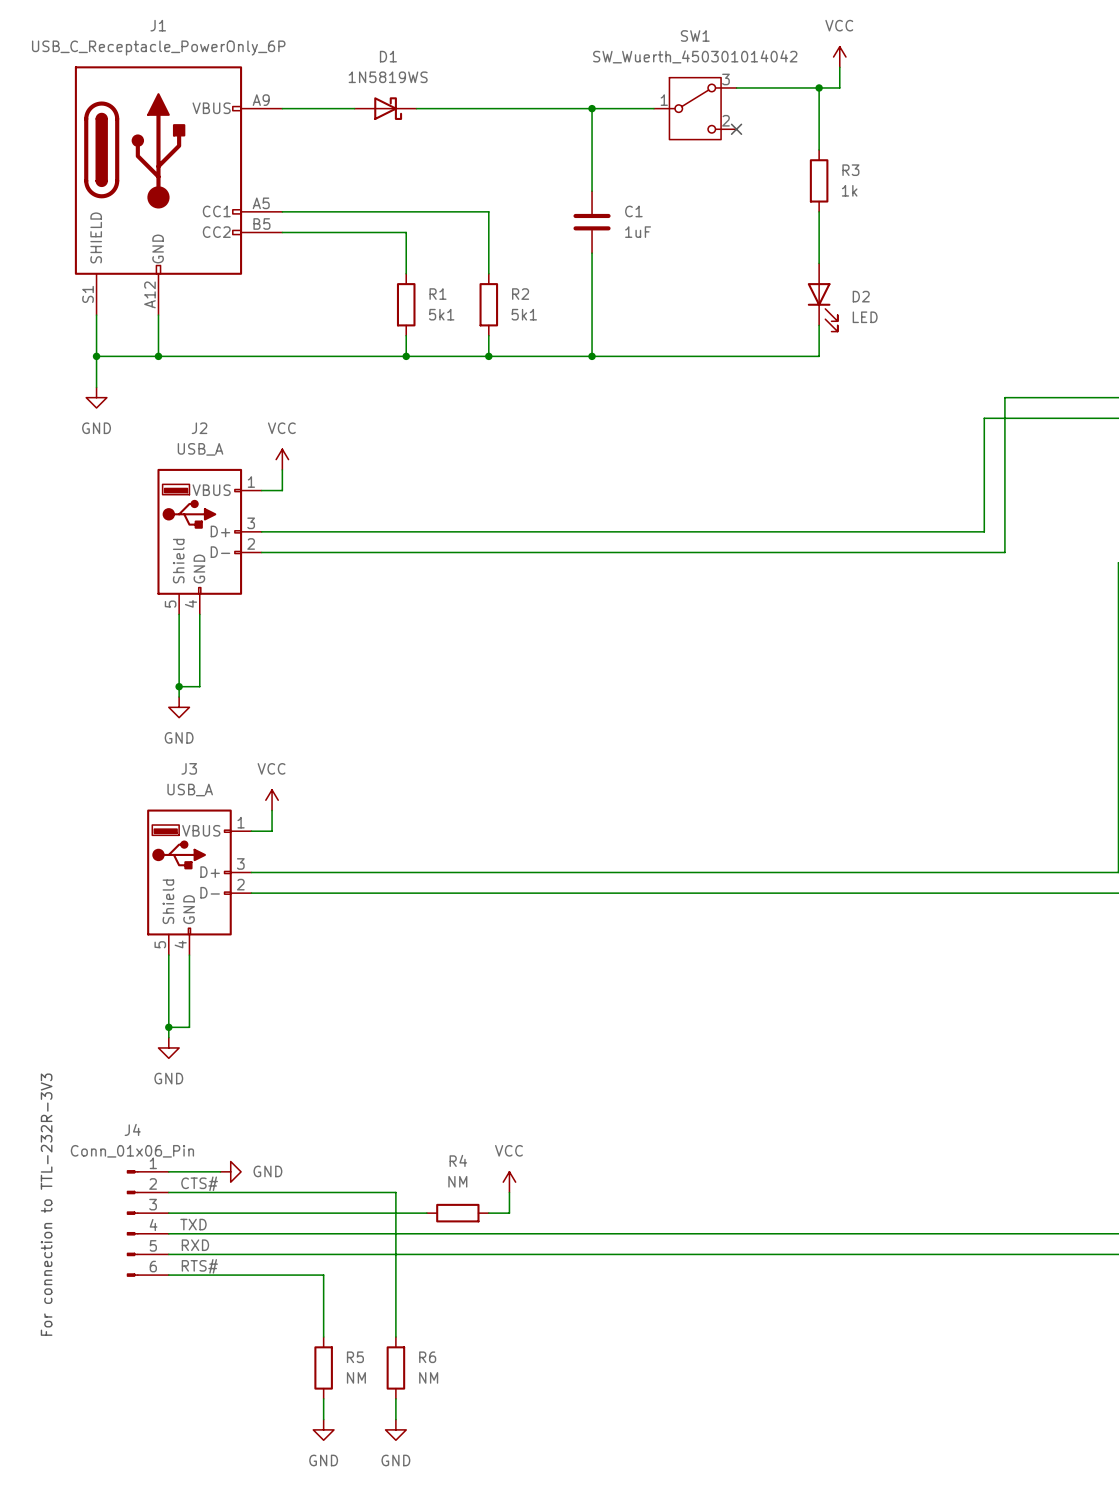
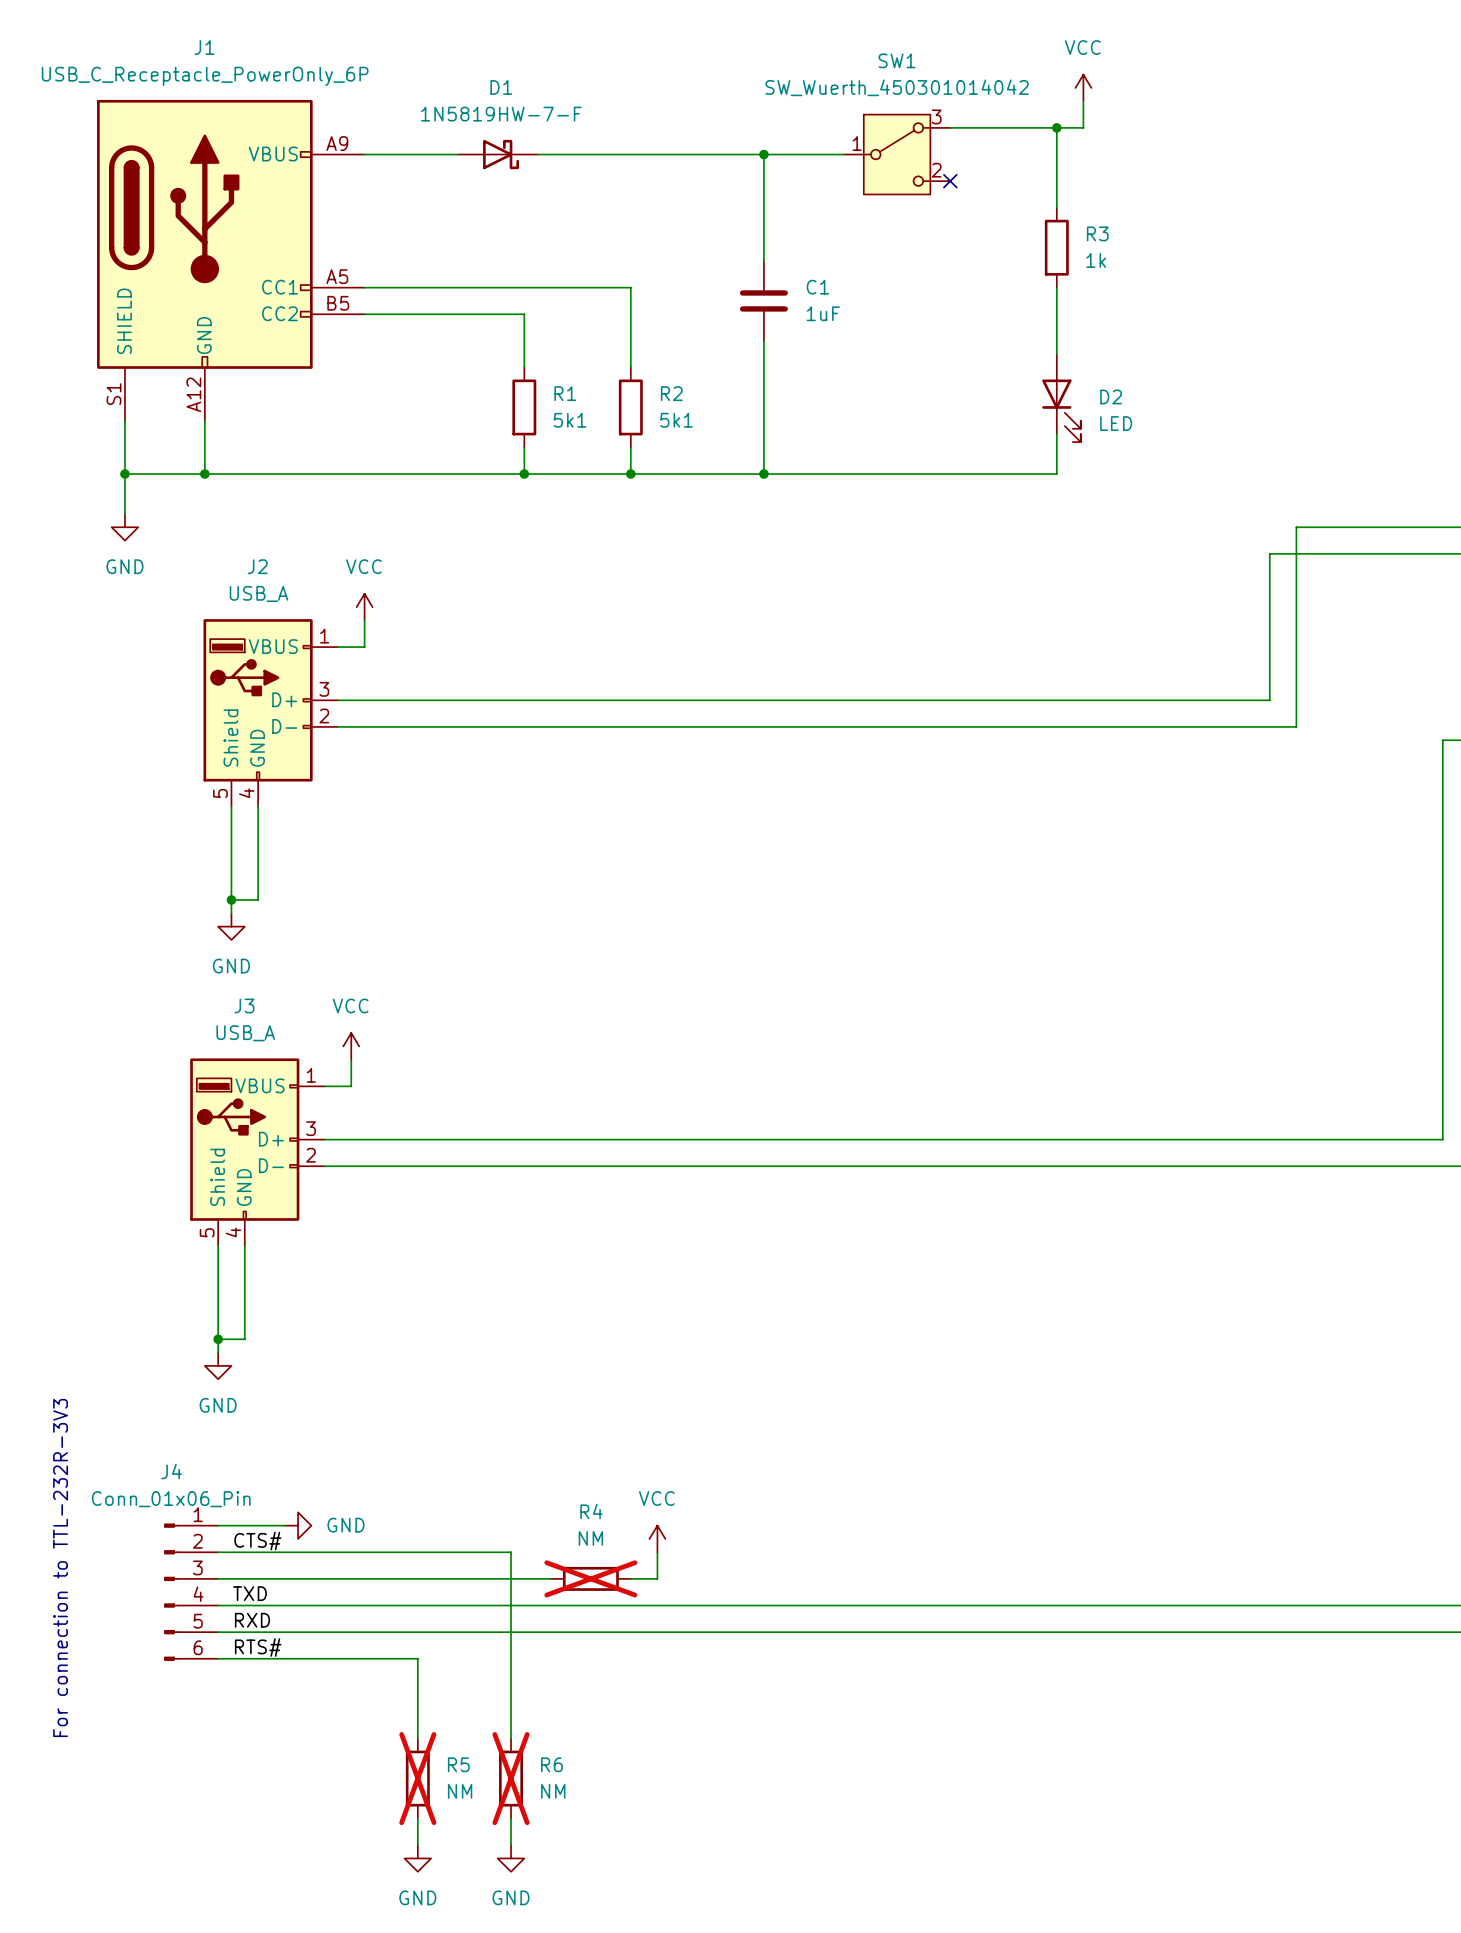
D1 value: 1N5819WS (388, 77) -> 1N5819HW-7-F (501, 114)
R4 do-not-place cross: none -> (590, 1578)
R5 do-not-place cross: none -> (417, 1778)
R6 do-not-place cross: none -> (511, 1778)

